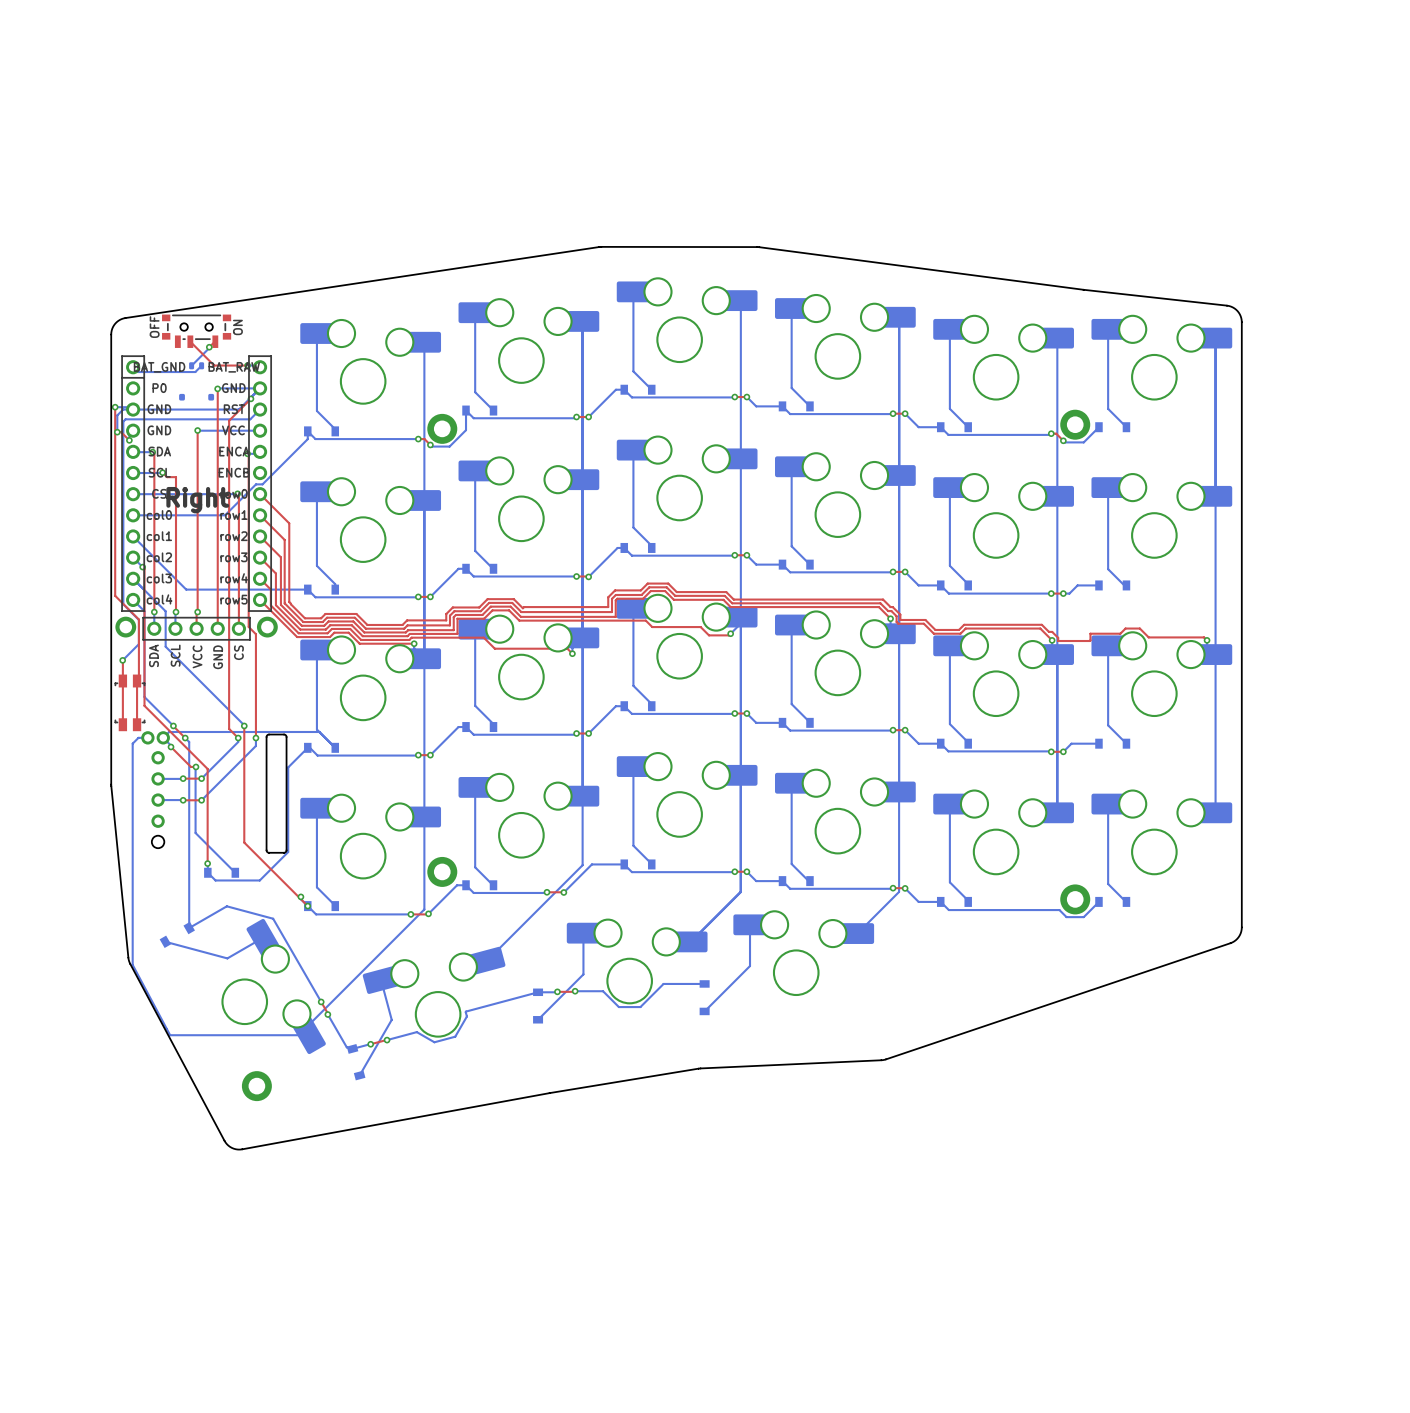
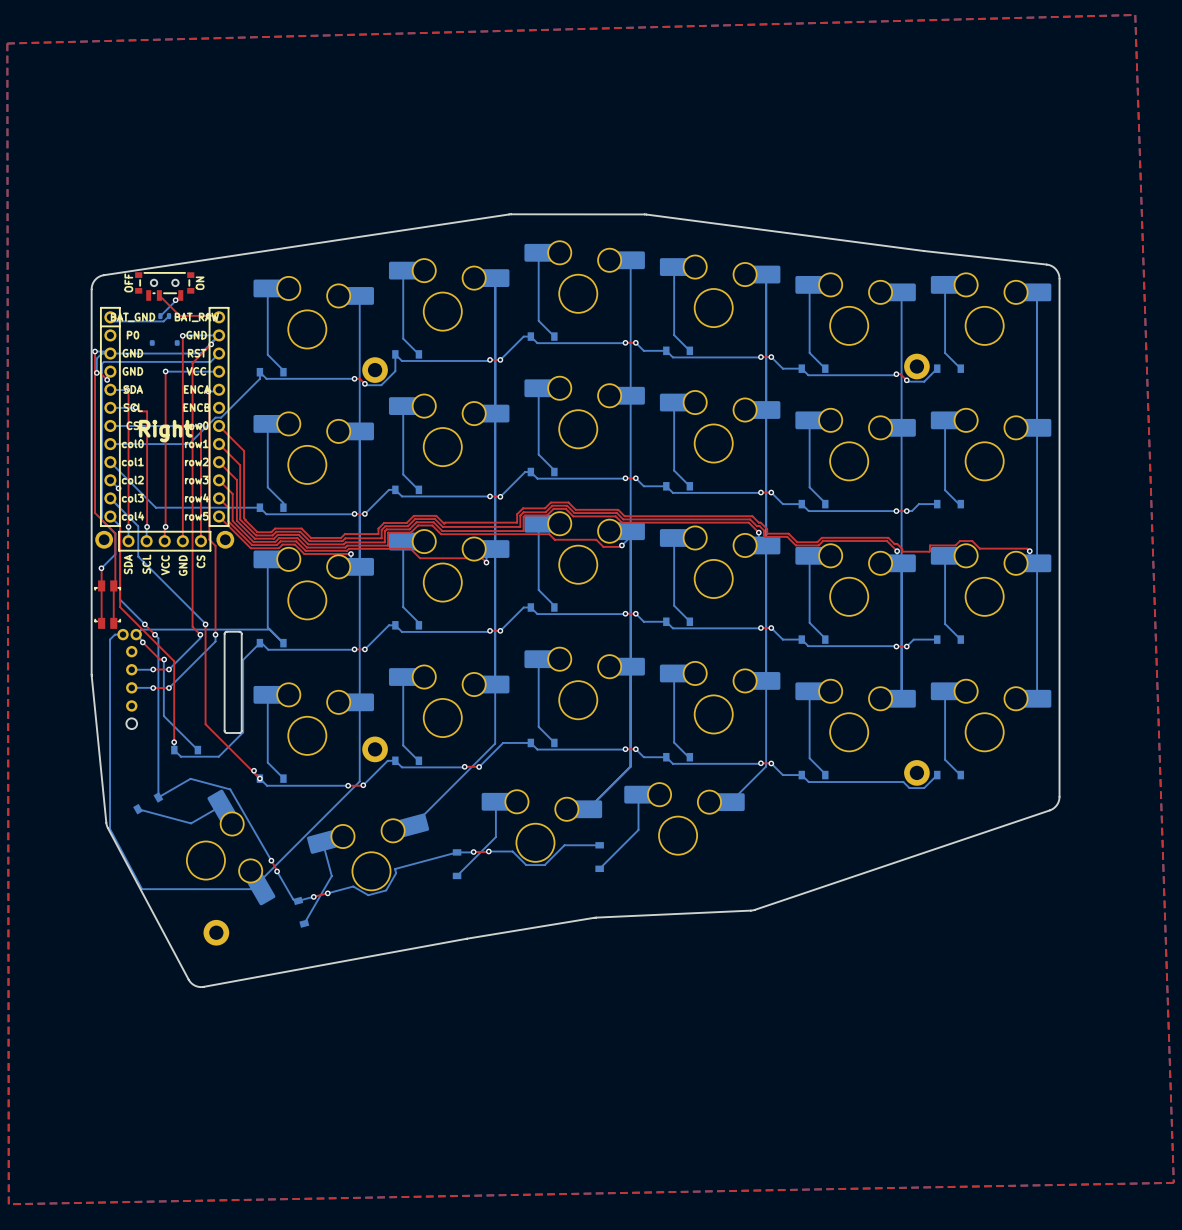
top zone outline: none -> (1135, 14) (7, 43) (8, 1204) (1173, 1182) (1135, 14)

